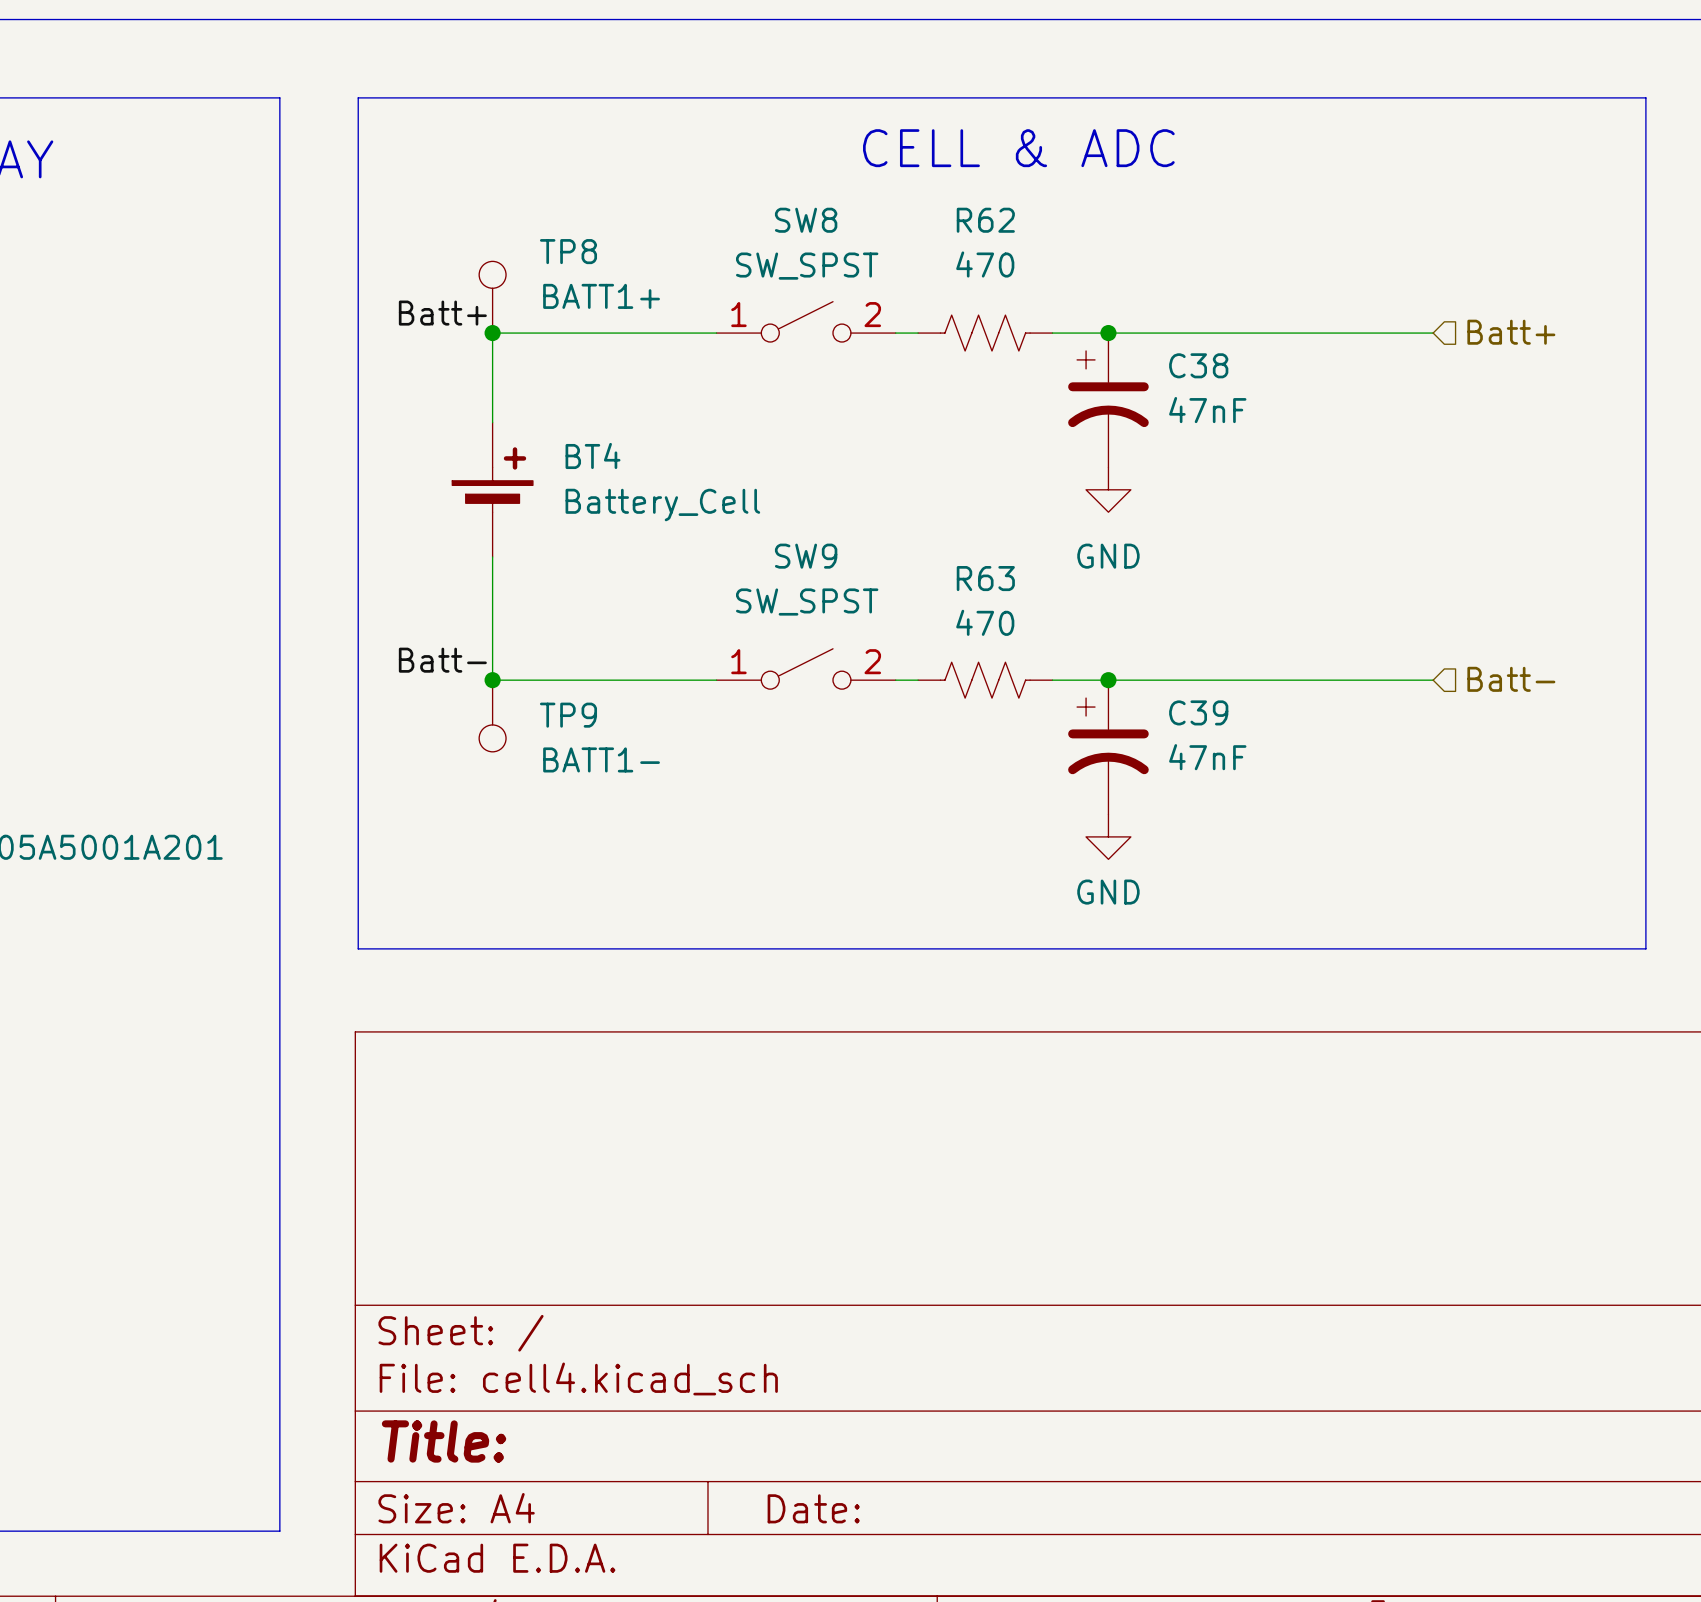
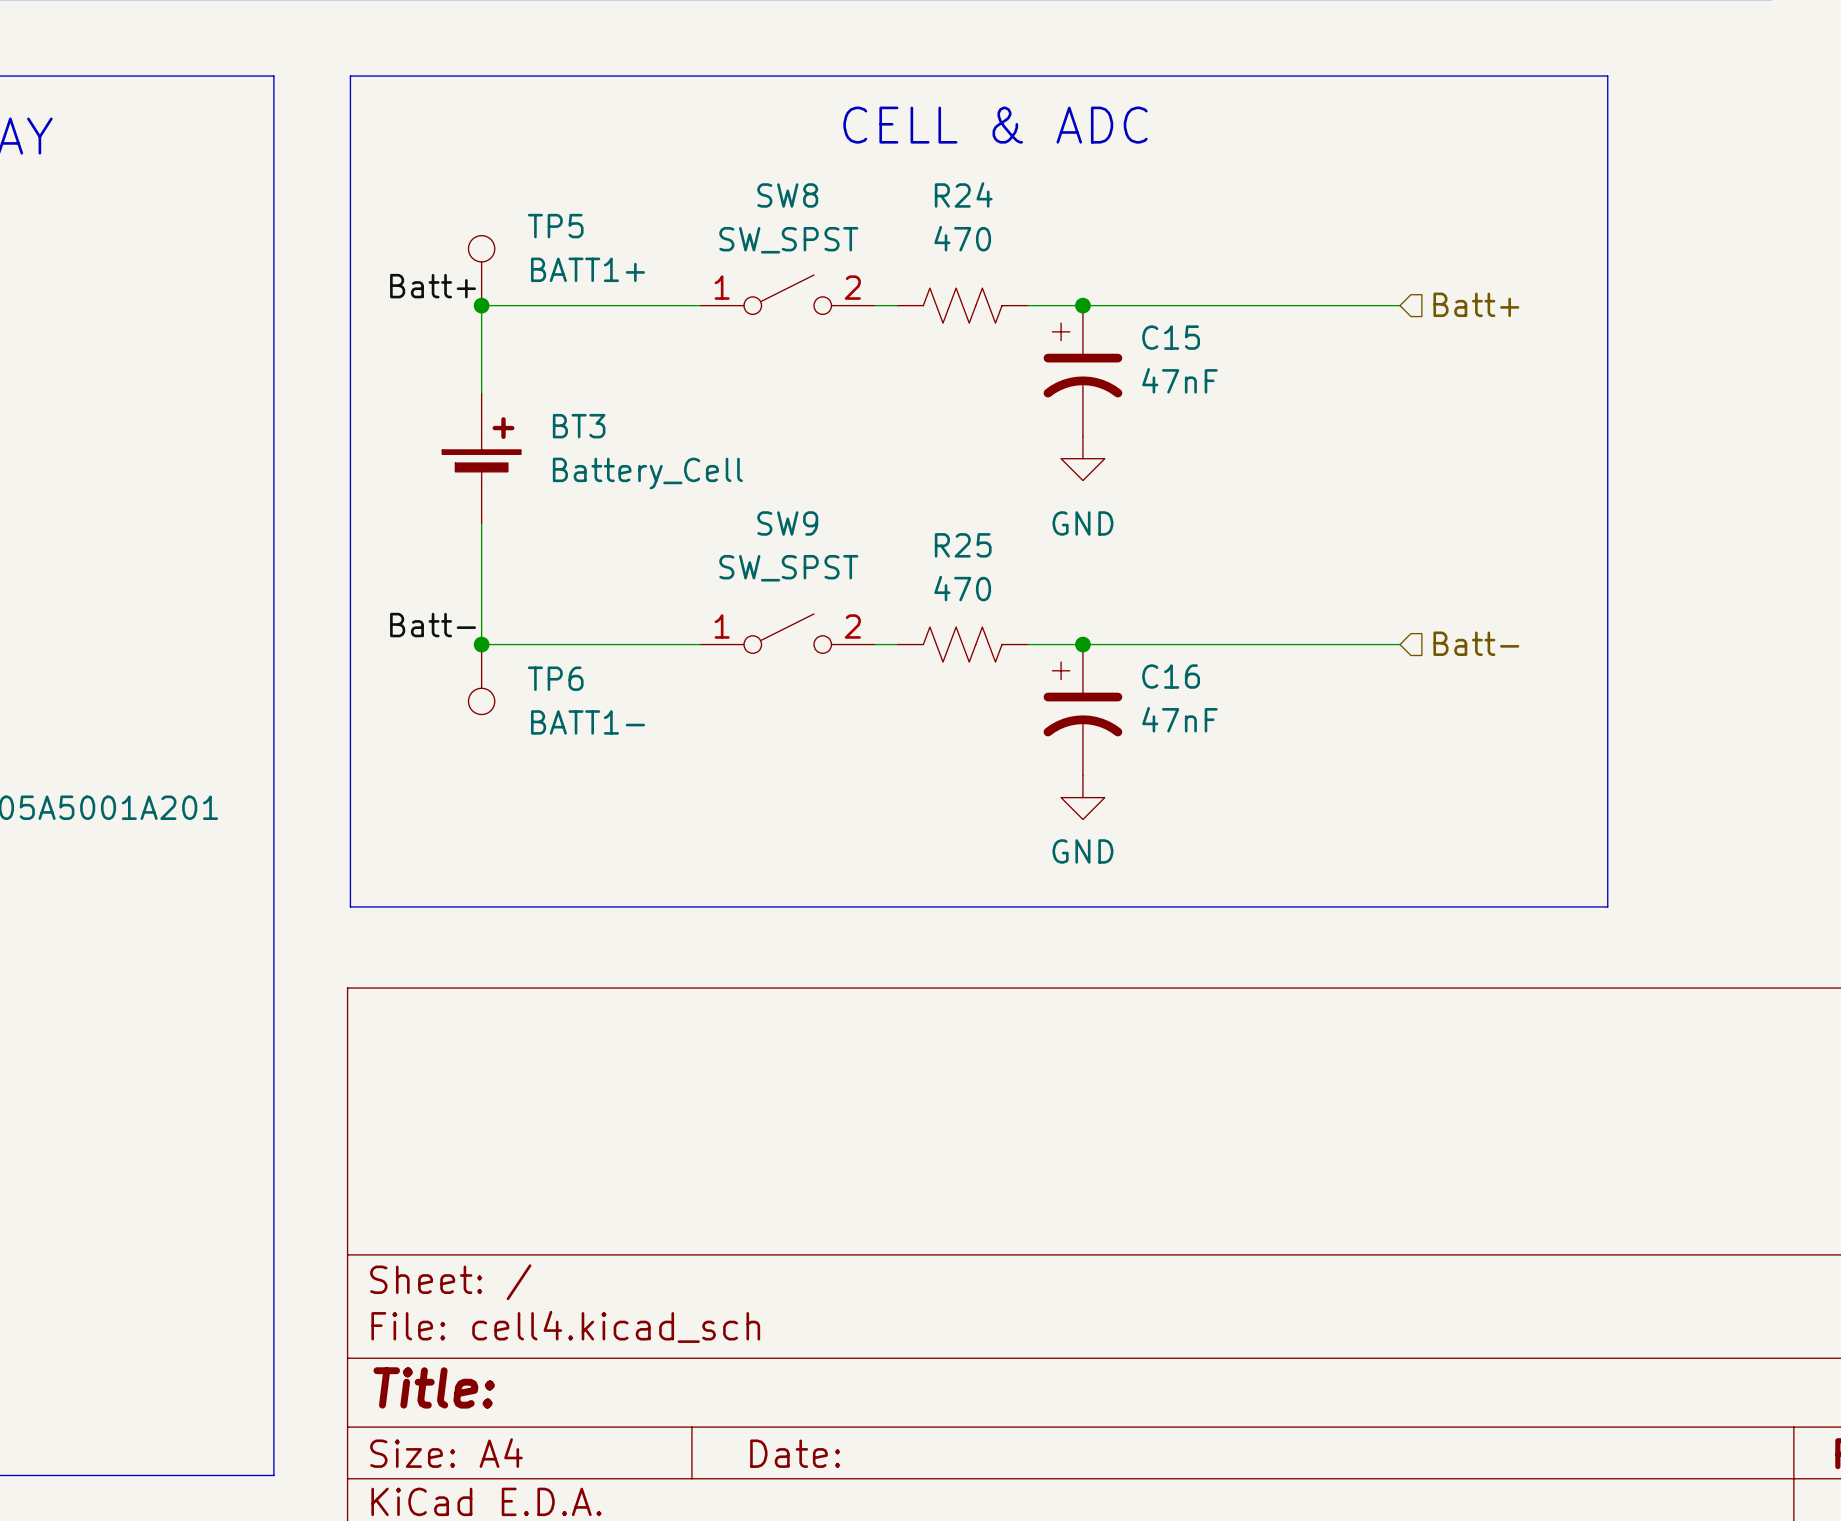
R62 name: R62 (985, 220) -> R24 (963, 194)
TP8 name: TP8 (568, 251) -> TP5 (555, 226)
C38 name: C38 (1198, 365) -> C15 (1171, 337)
BT4 name: BT4 (593, 455) -> BT3 (579, 426)
R63 name: R63 (985, 578) -> R25 (963, 545)
C39 name: C39 (1198, 712) -> C16 (1171, 676)
TP9 name: TP9 (568, 715) -> TP6 (555, 678)

